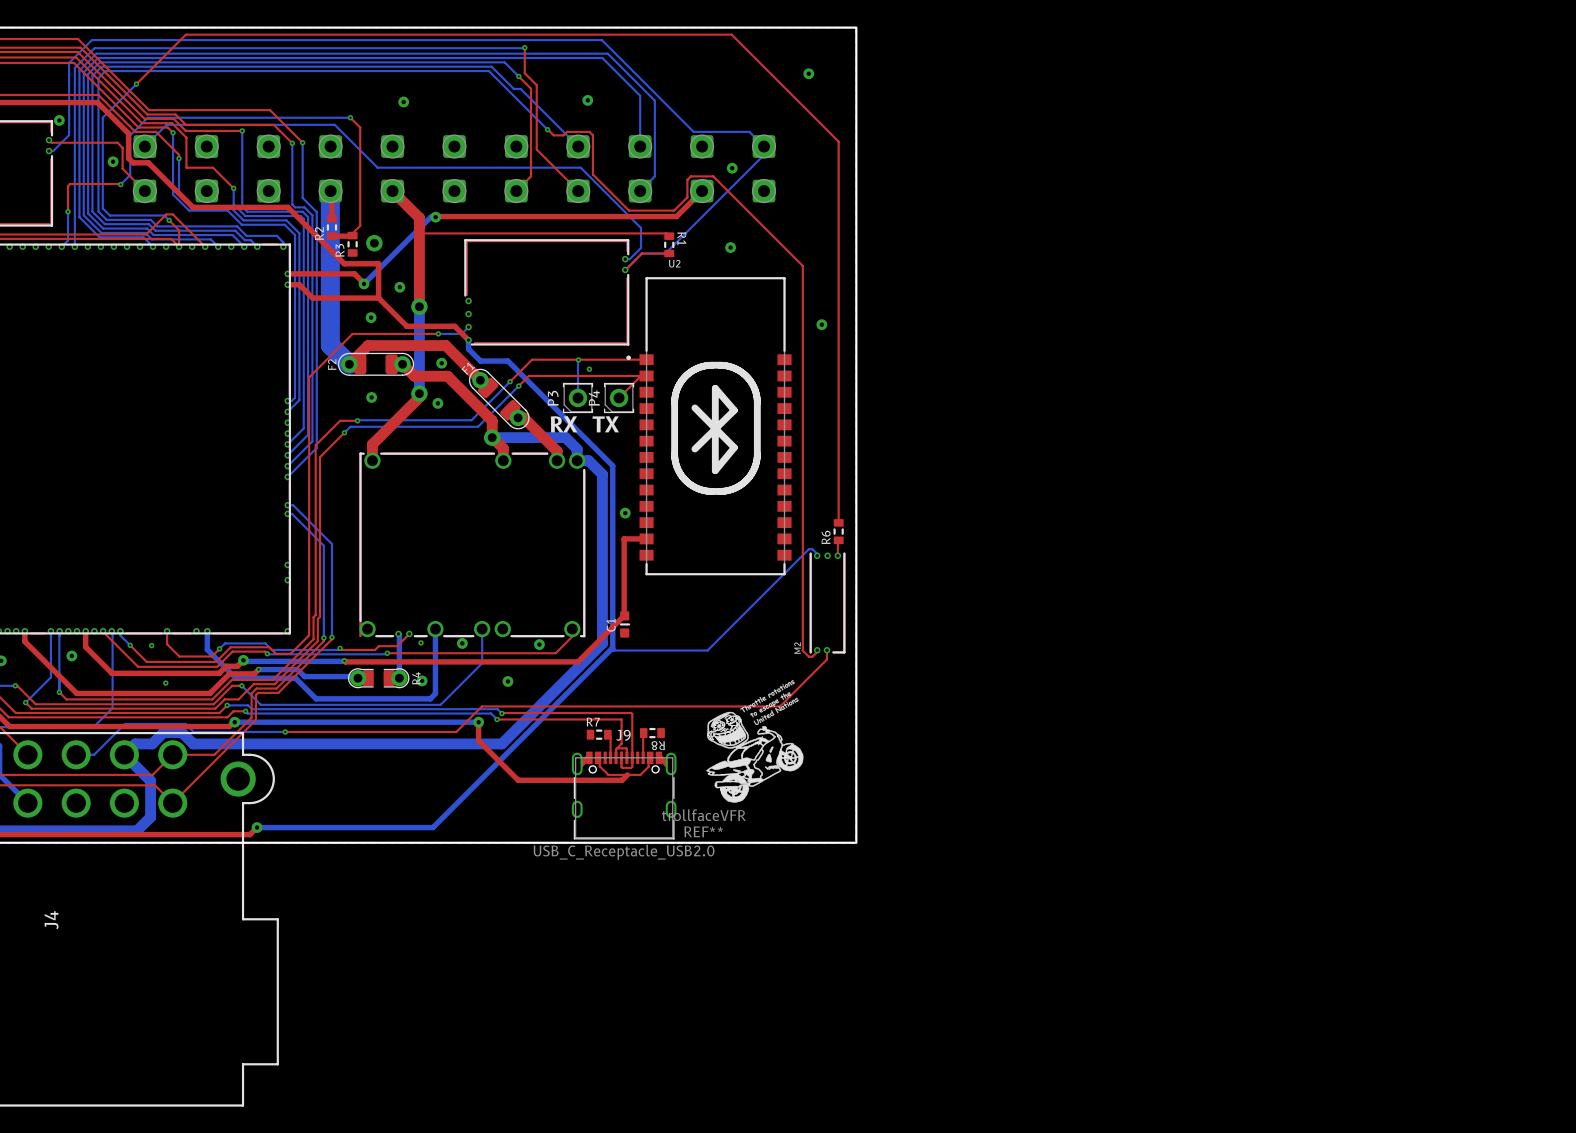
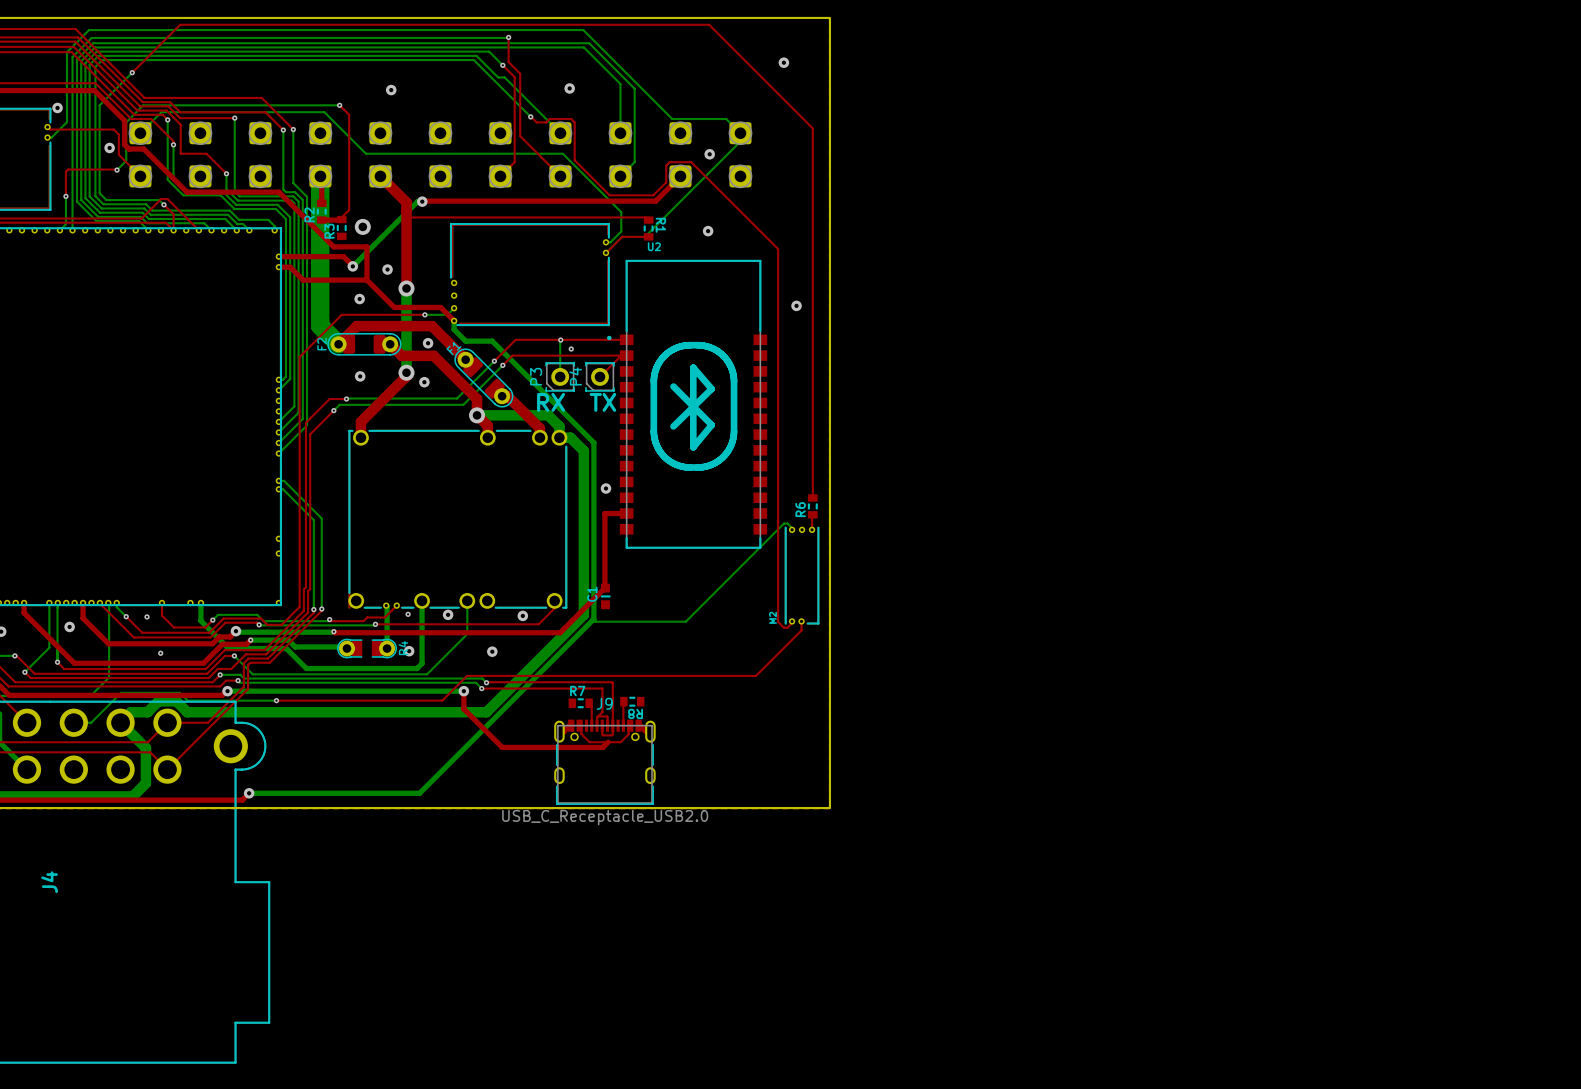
REF**: trollfaceVFR (754, 741) -> none

